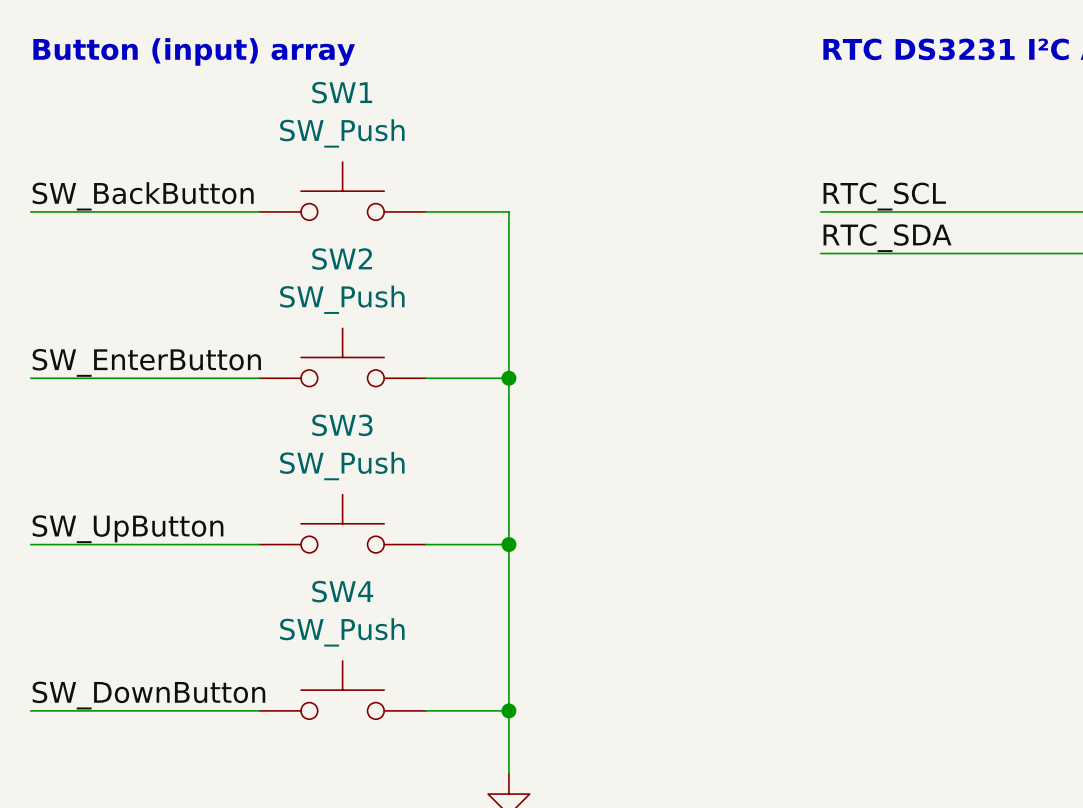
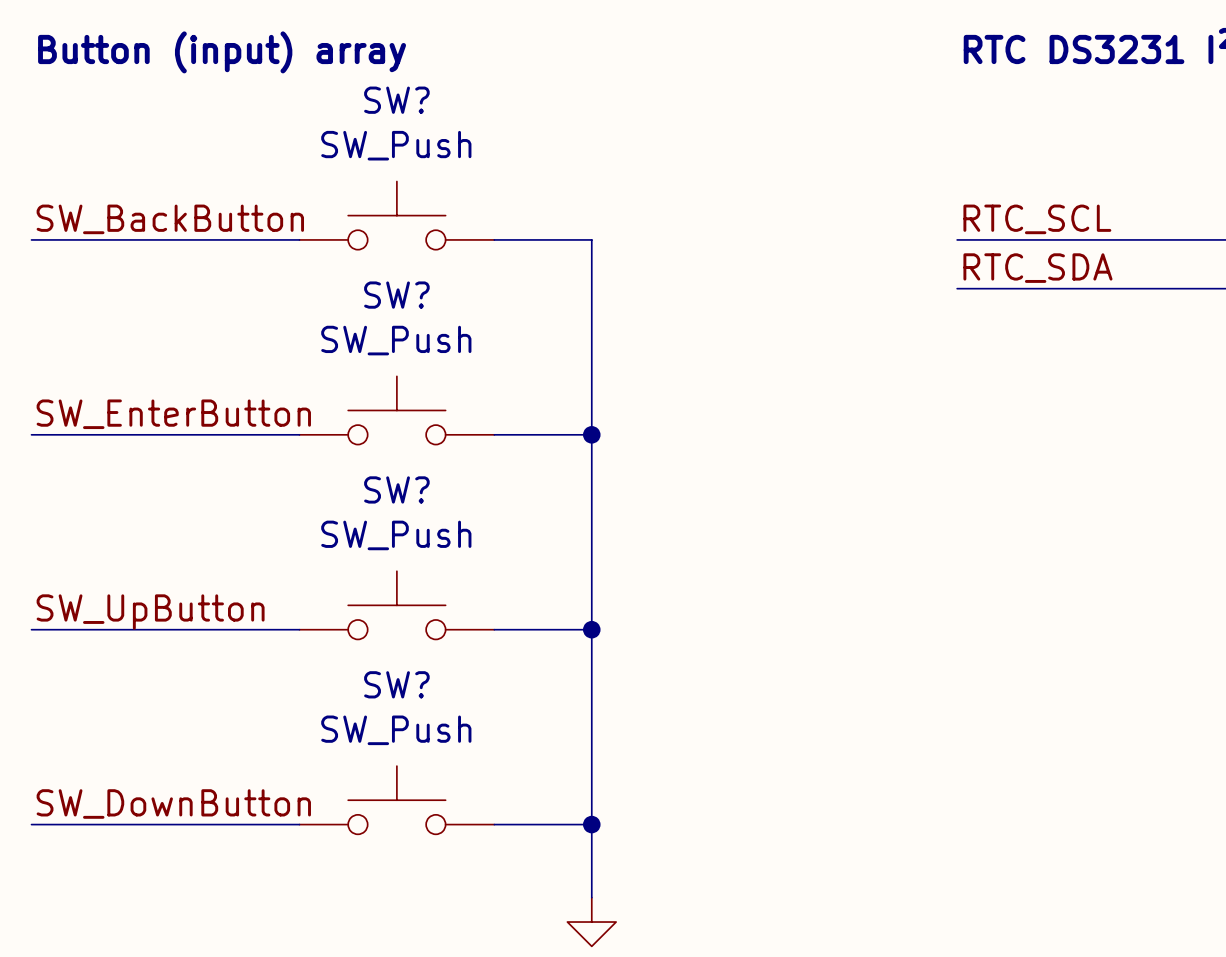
SW1 name: SW1 (342, 92) -> SW? (396, 100)
SW2 name: SW2 (342, 259) -> SW? (396, 295)
SW3 name: SW3 (342, 425) -> SW? (396, 489)
SW4 name: SW4 (342, 591) -> SW? (396, 684)

